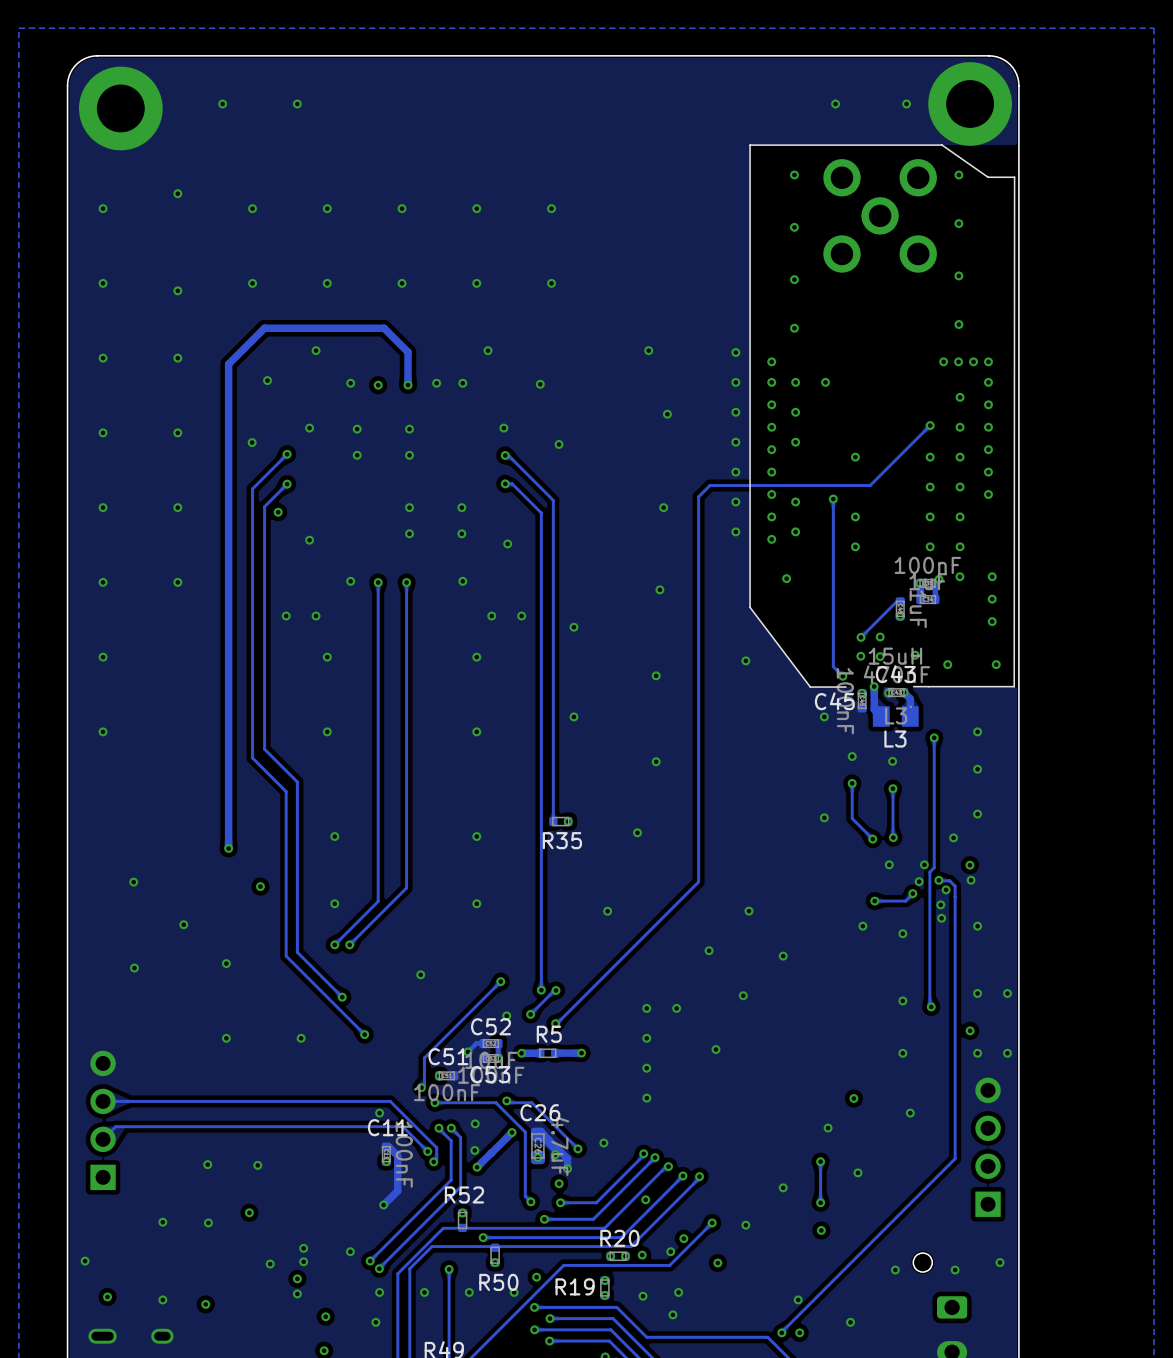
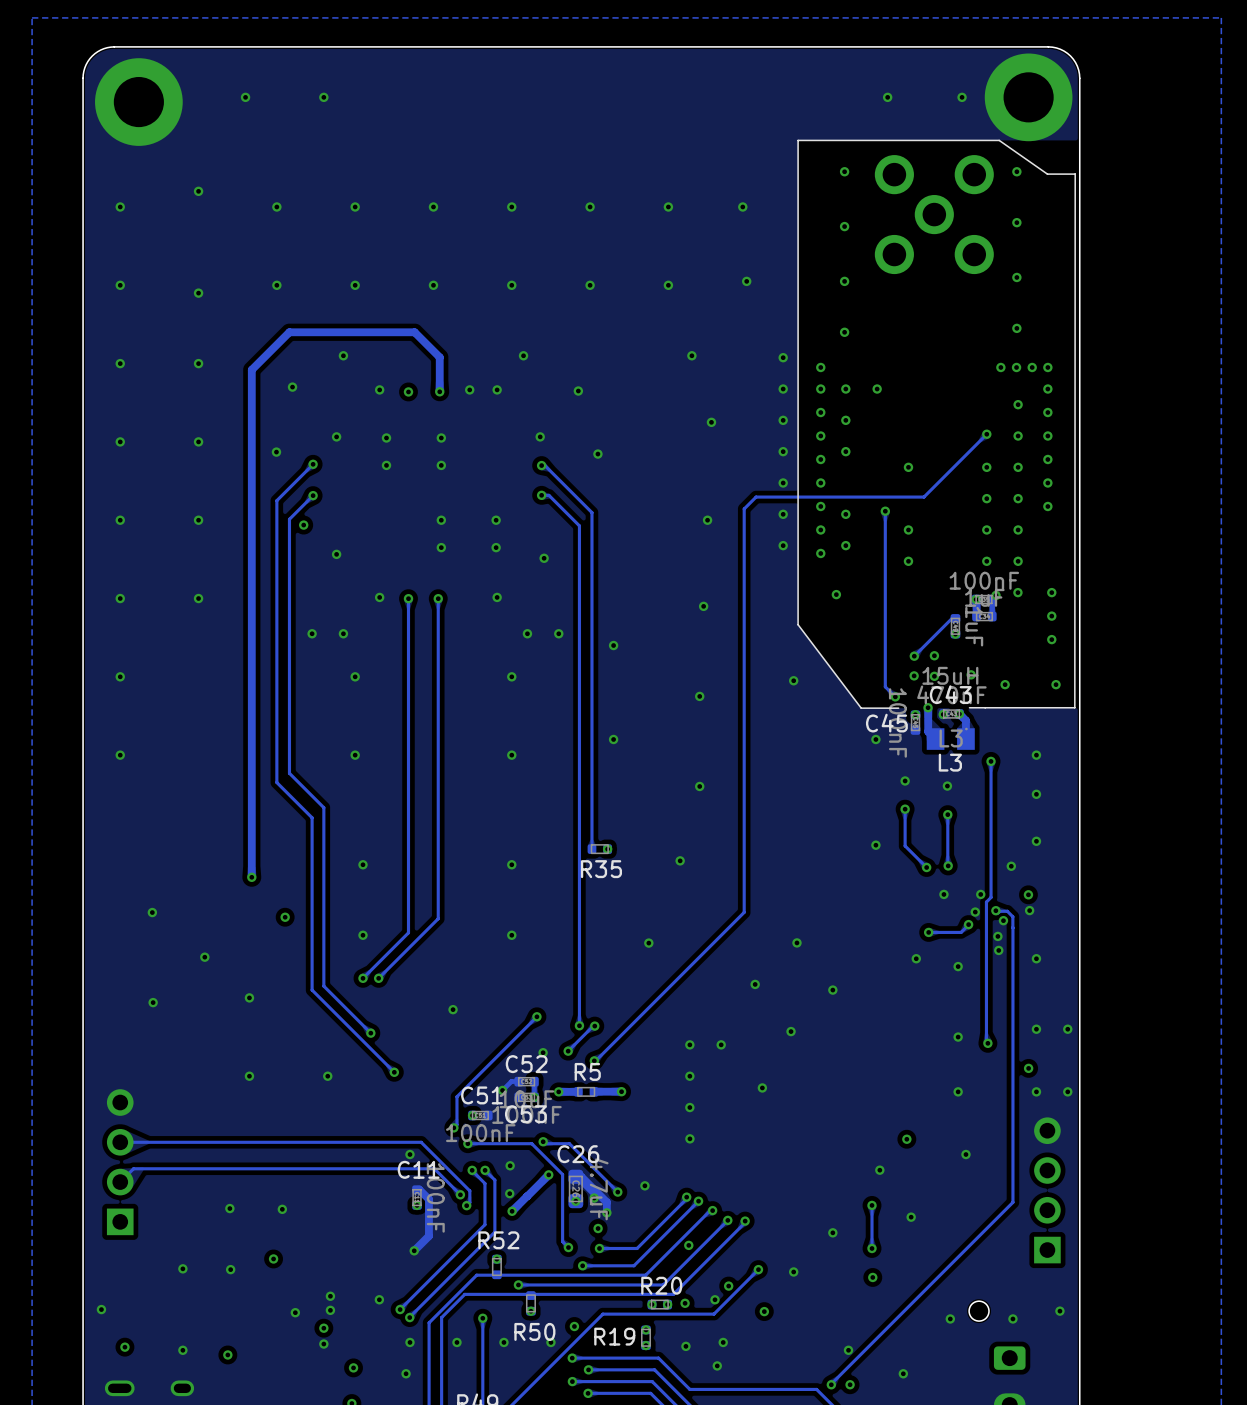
via: none -> (668, 206)
via: none -> (742, 206)
via: none -> (746, 281)
via: none -> (668, 285)

